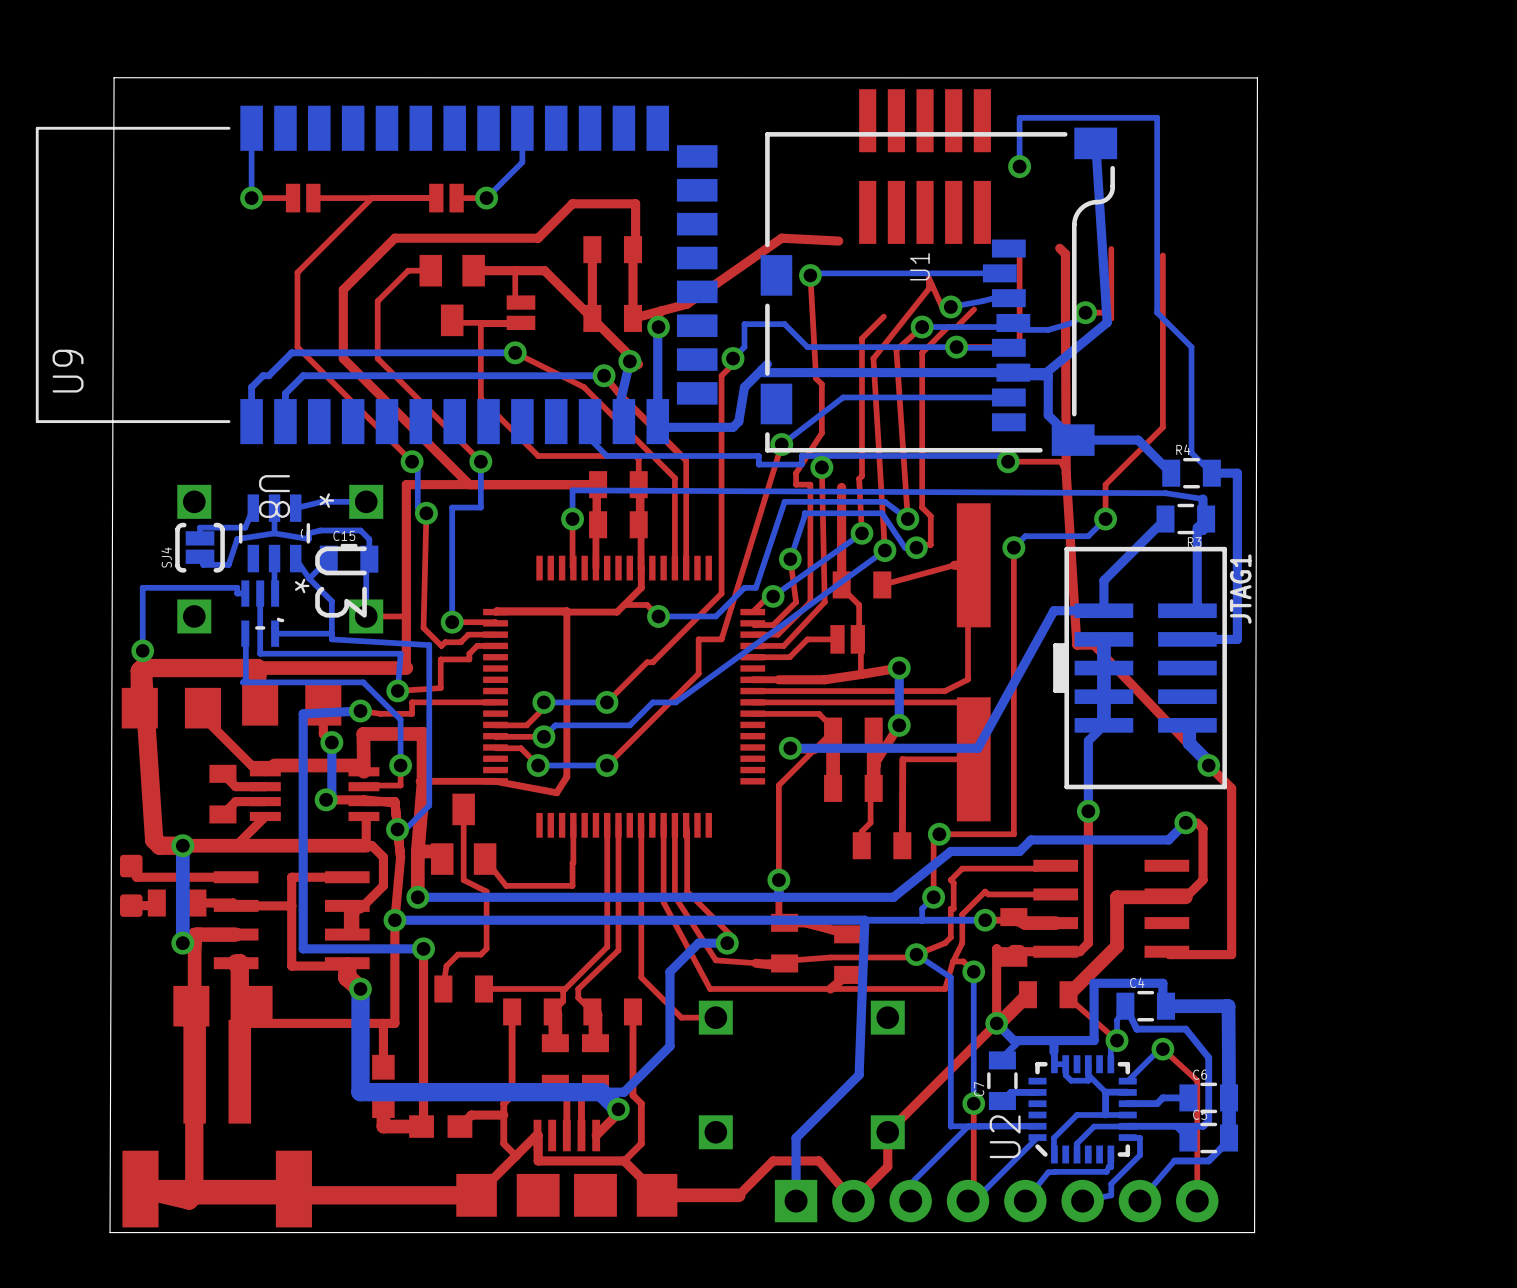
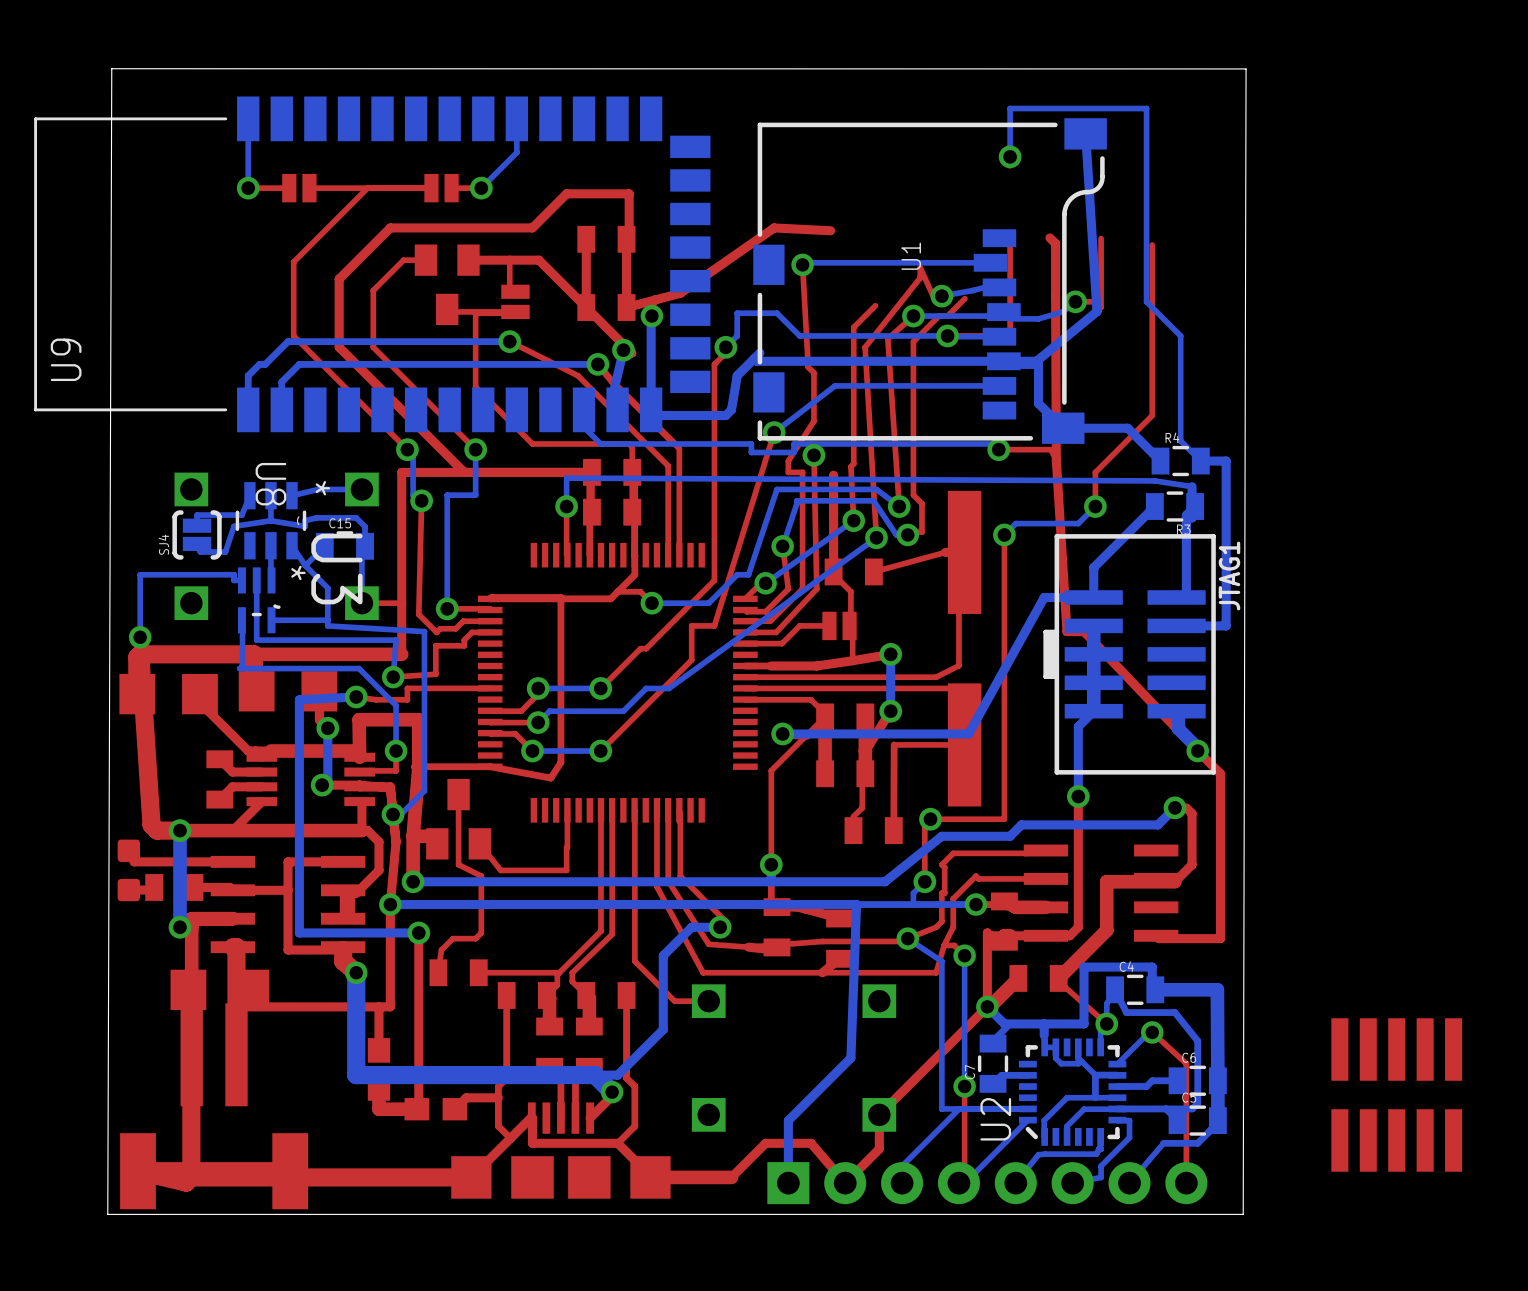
part: (925, 166) -> none
part: none -> (1396, 1095)

